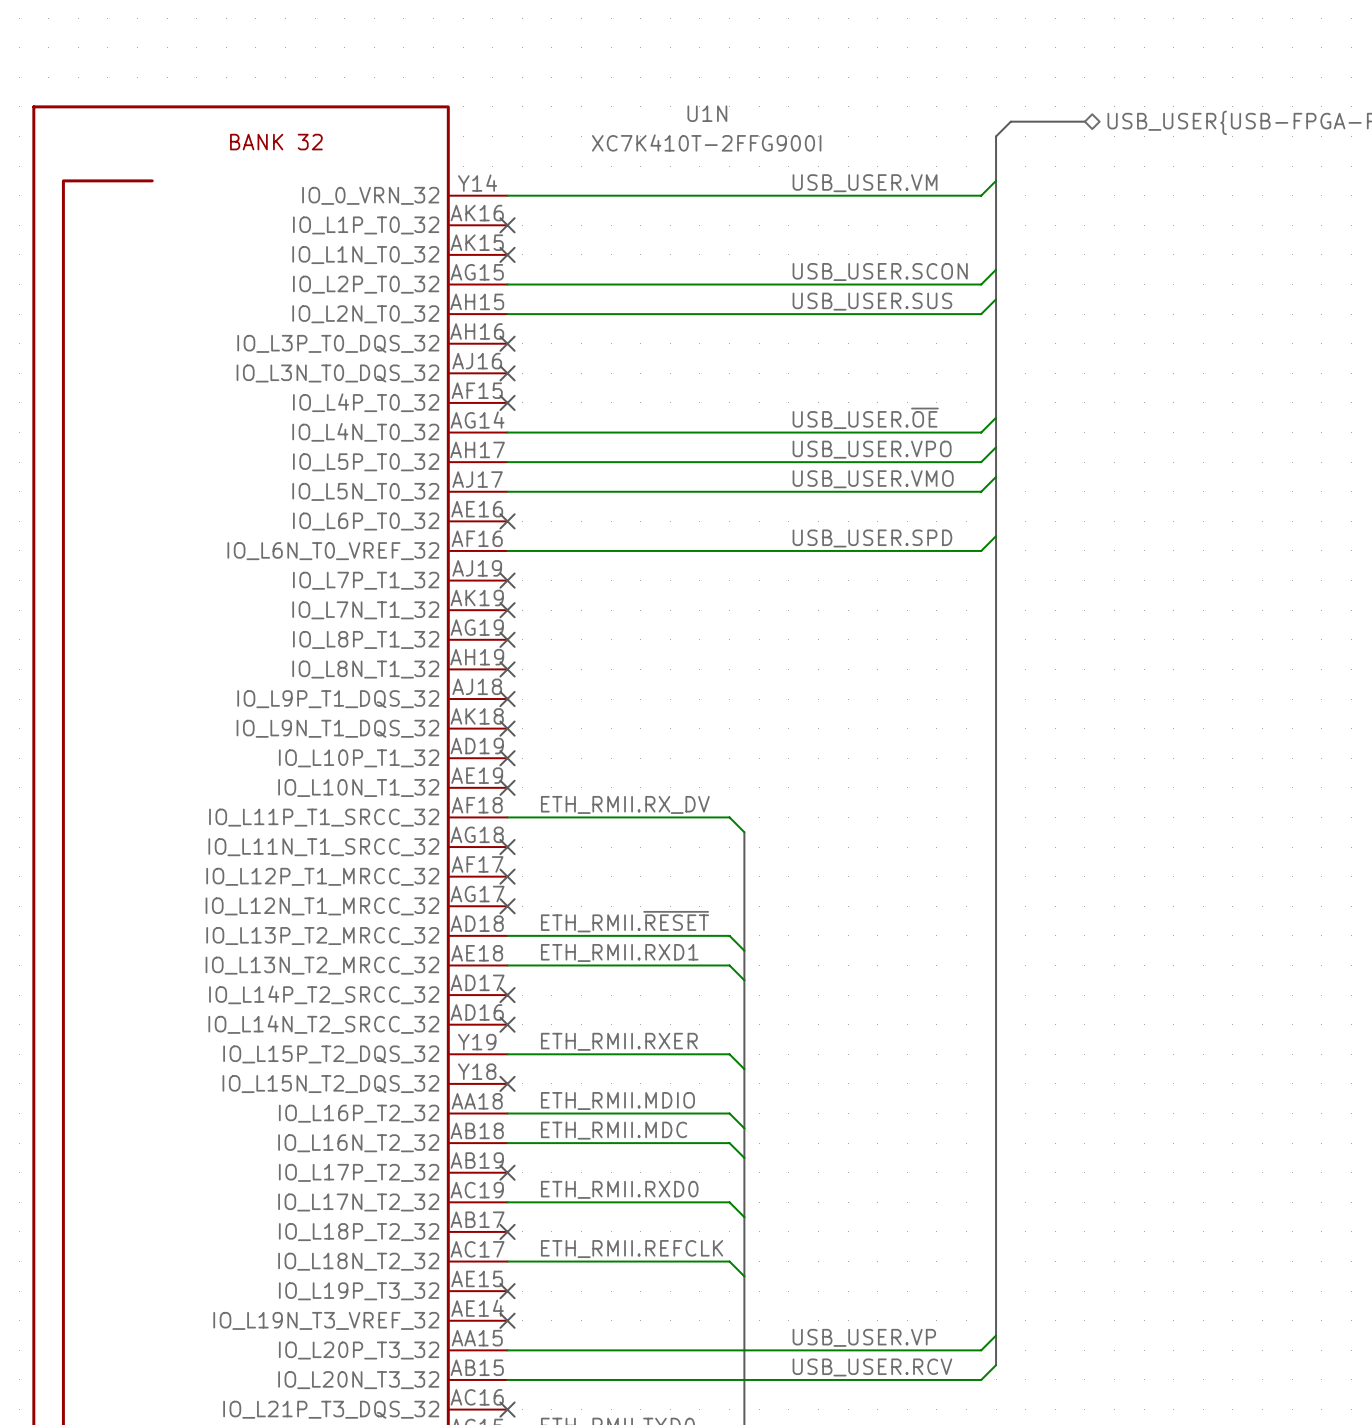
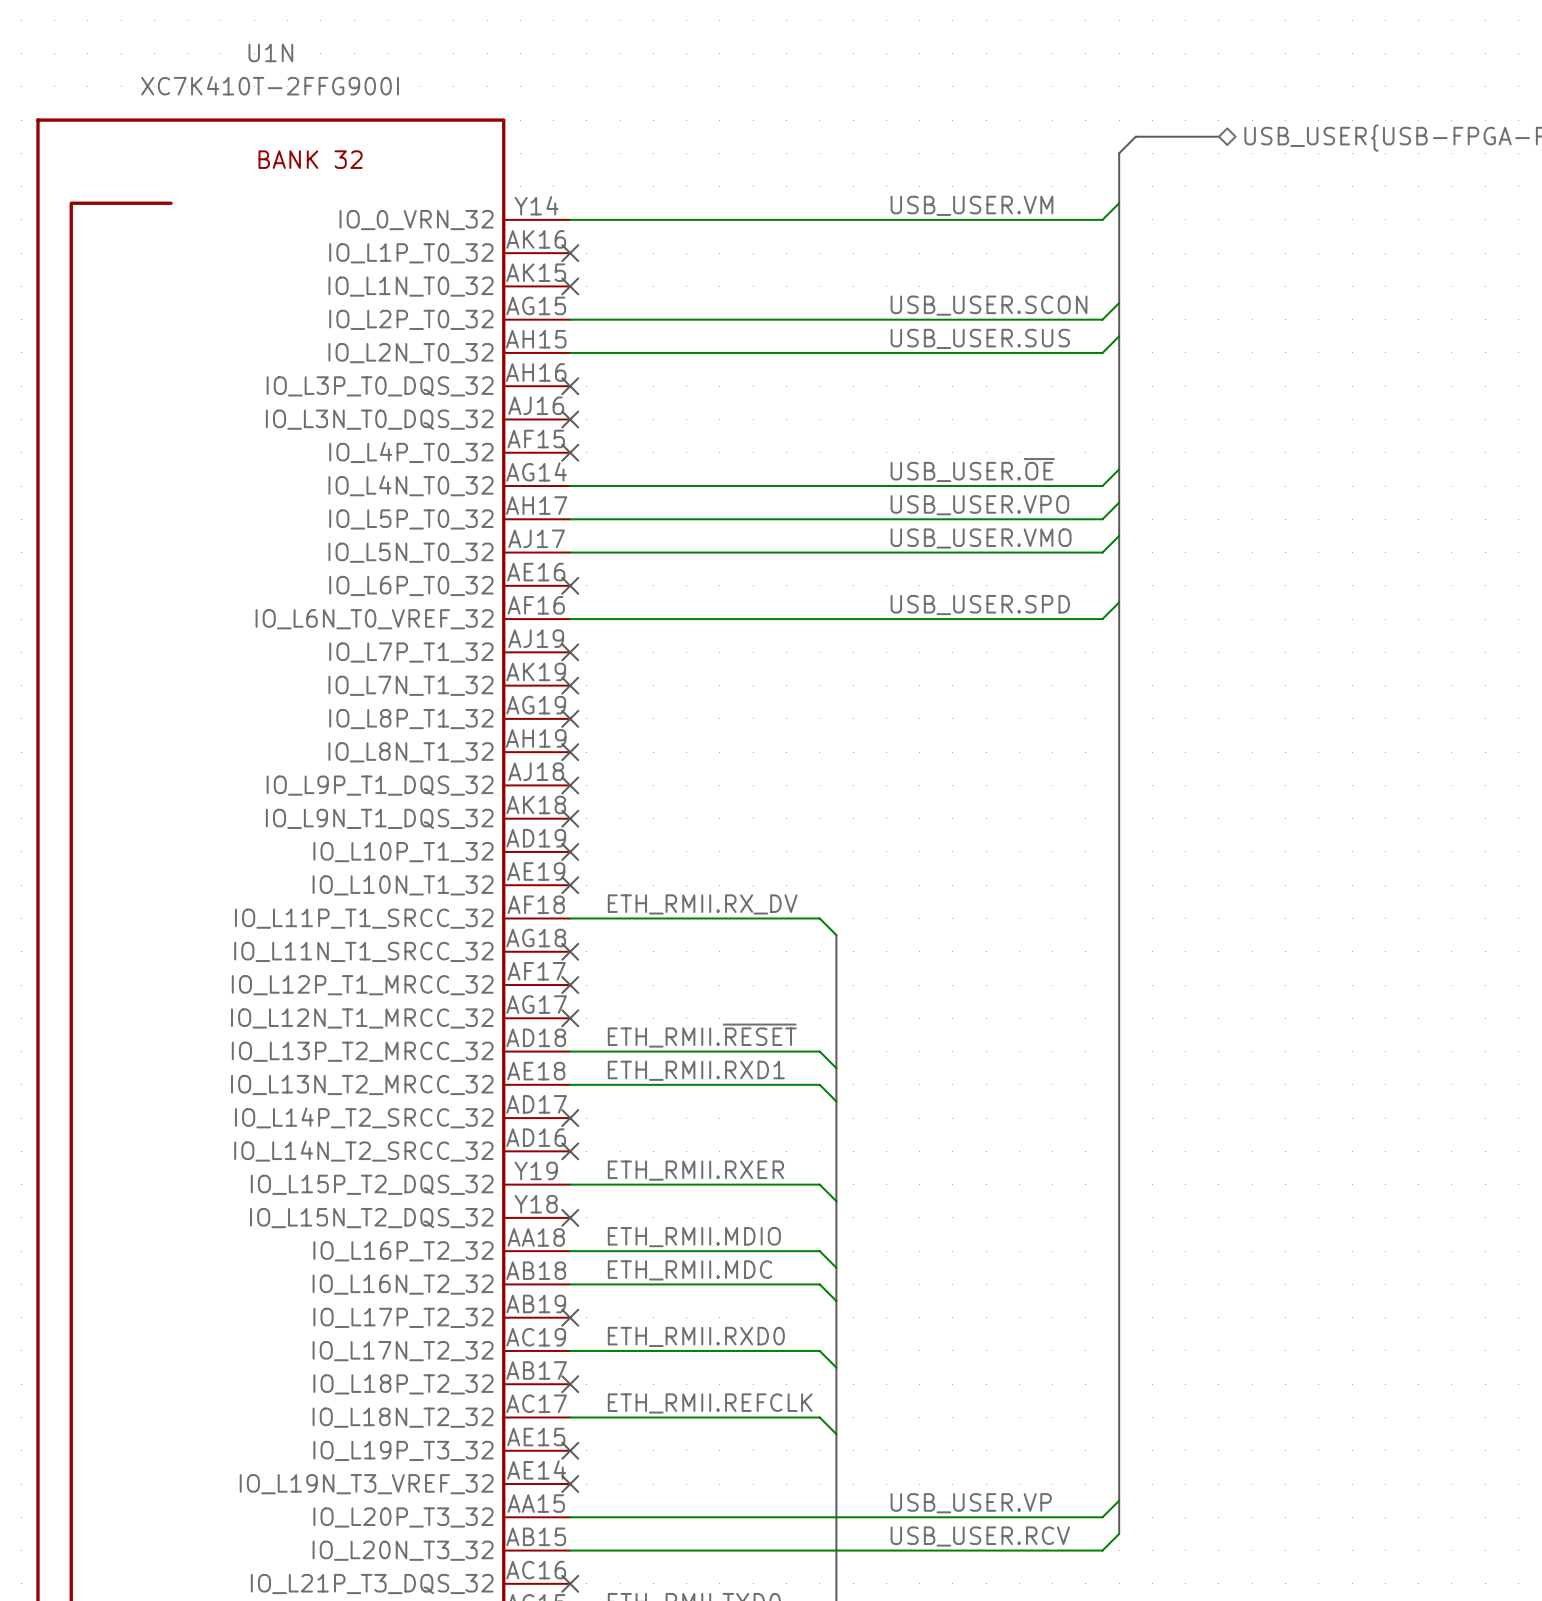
U1N name position: U1N (707, 113) -> U1N (270, 52)
U1N value position: XC7K410T-2FFG900I (706, 142) -> XC7K410T-2FFG900I (270, 85)

